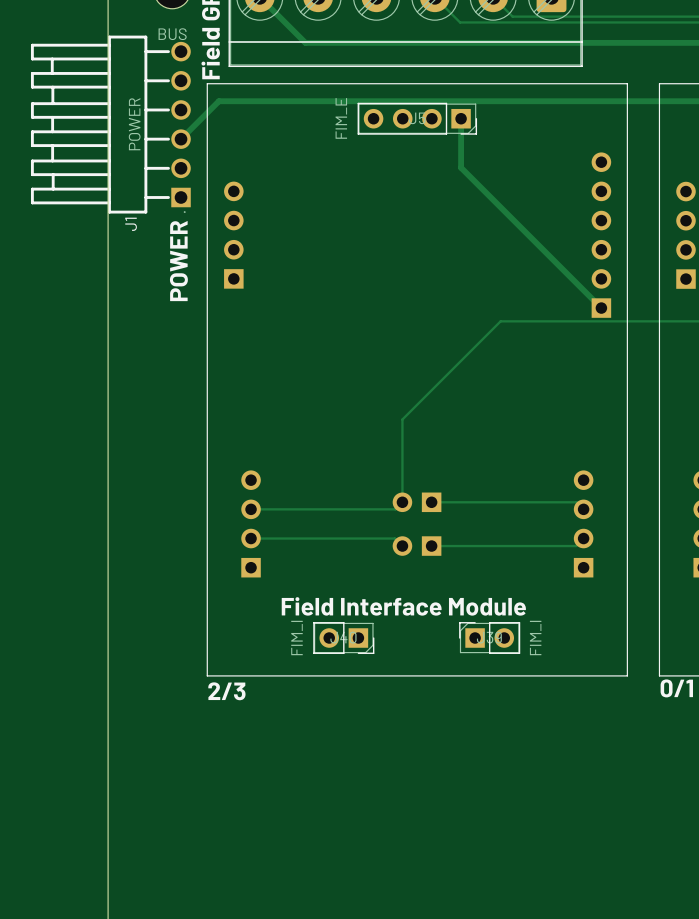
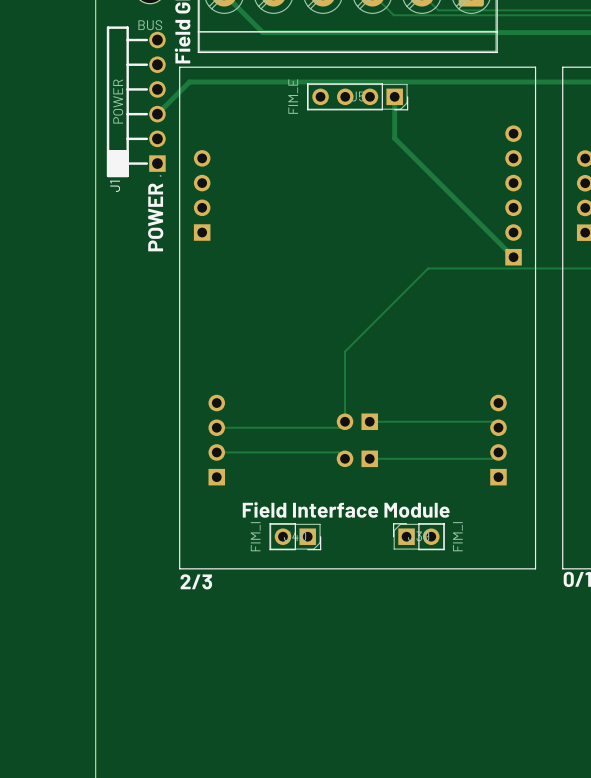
J1 footprint: [30, 35, 191, 214] -> [106, 26, 166, 178]

